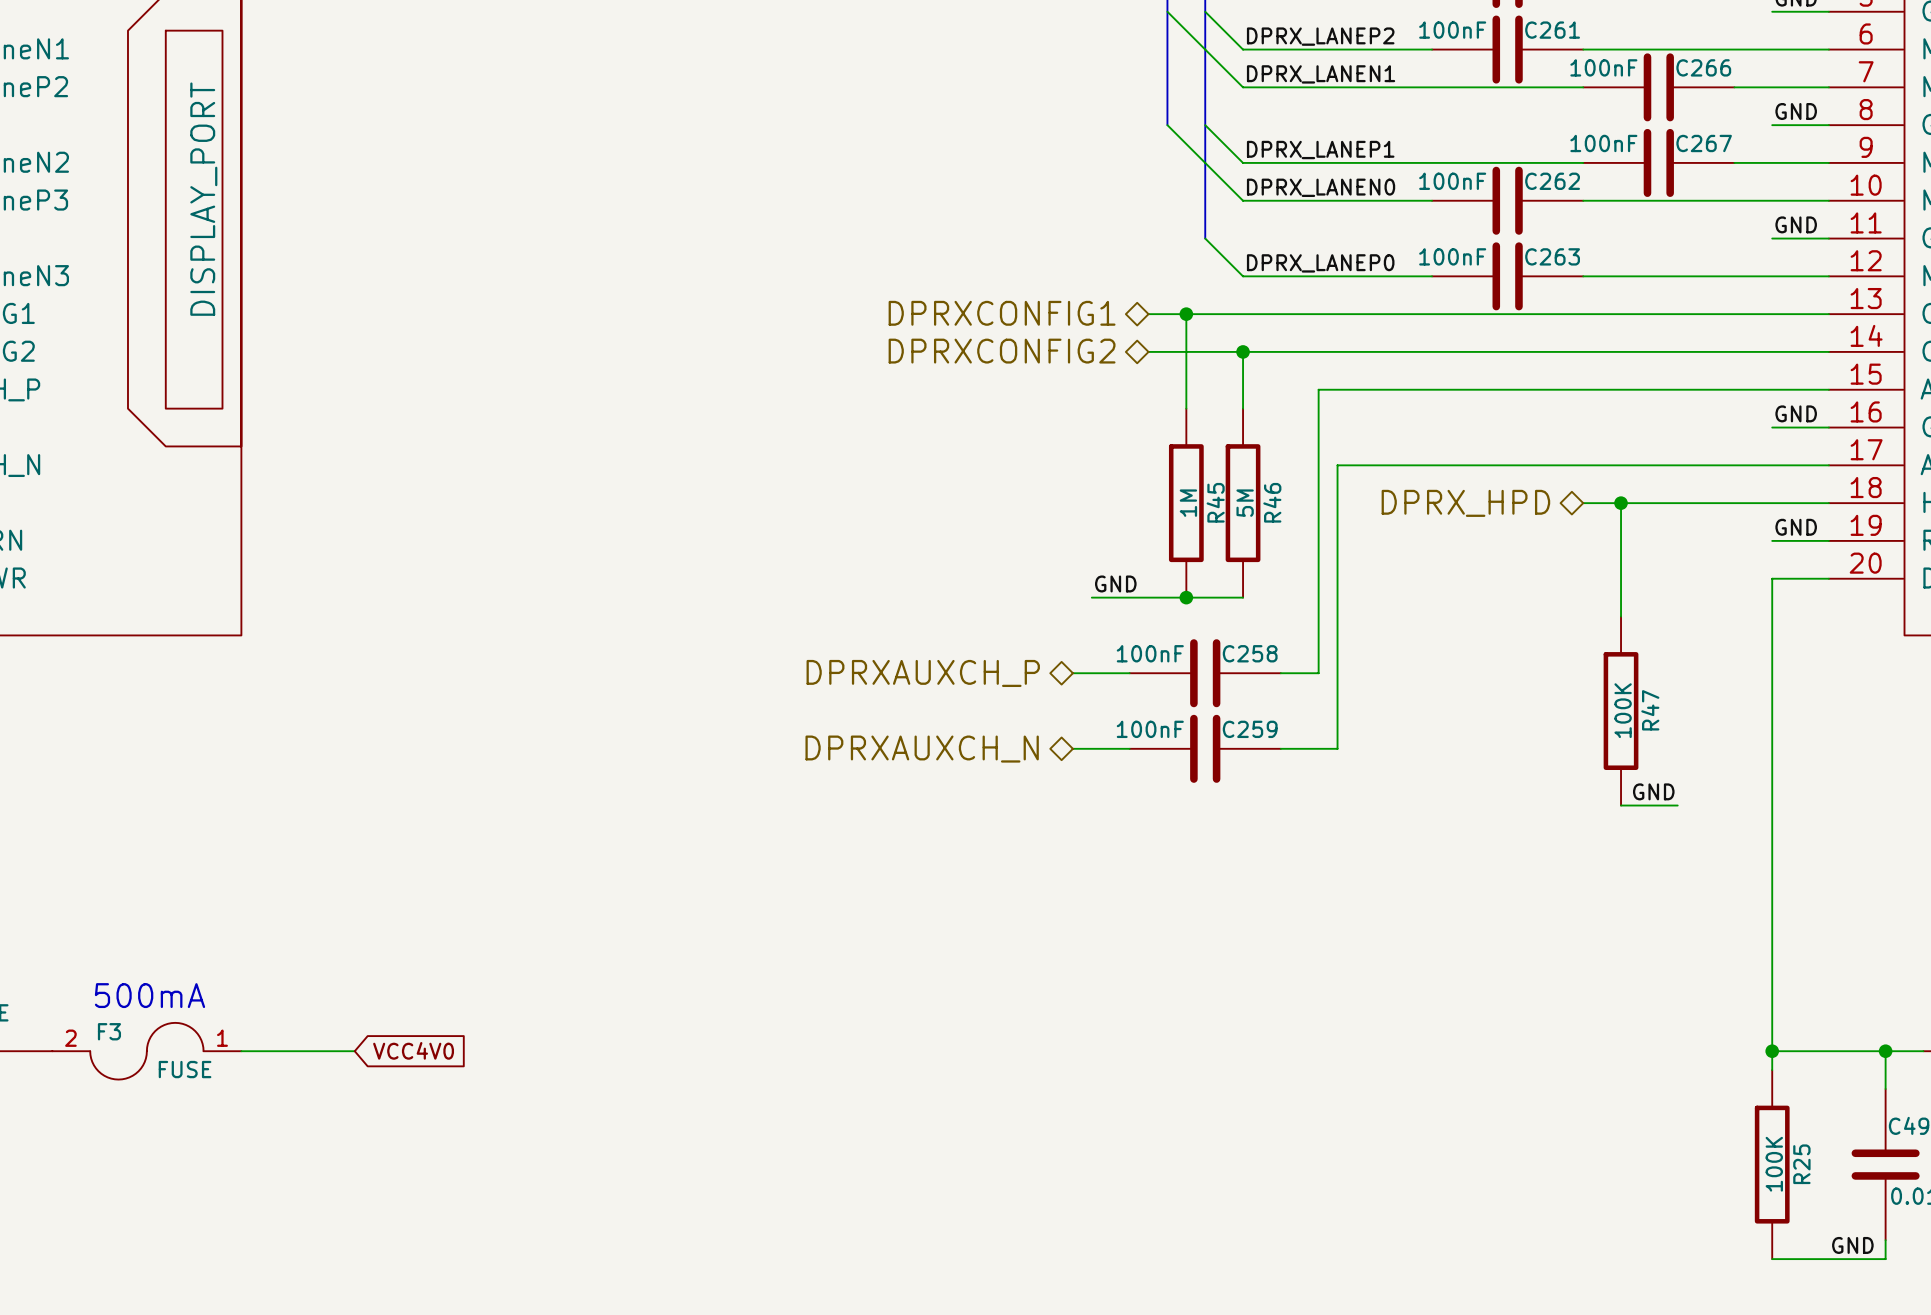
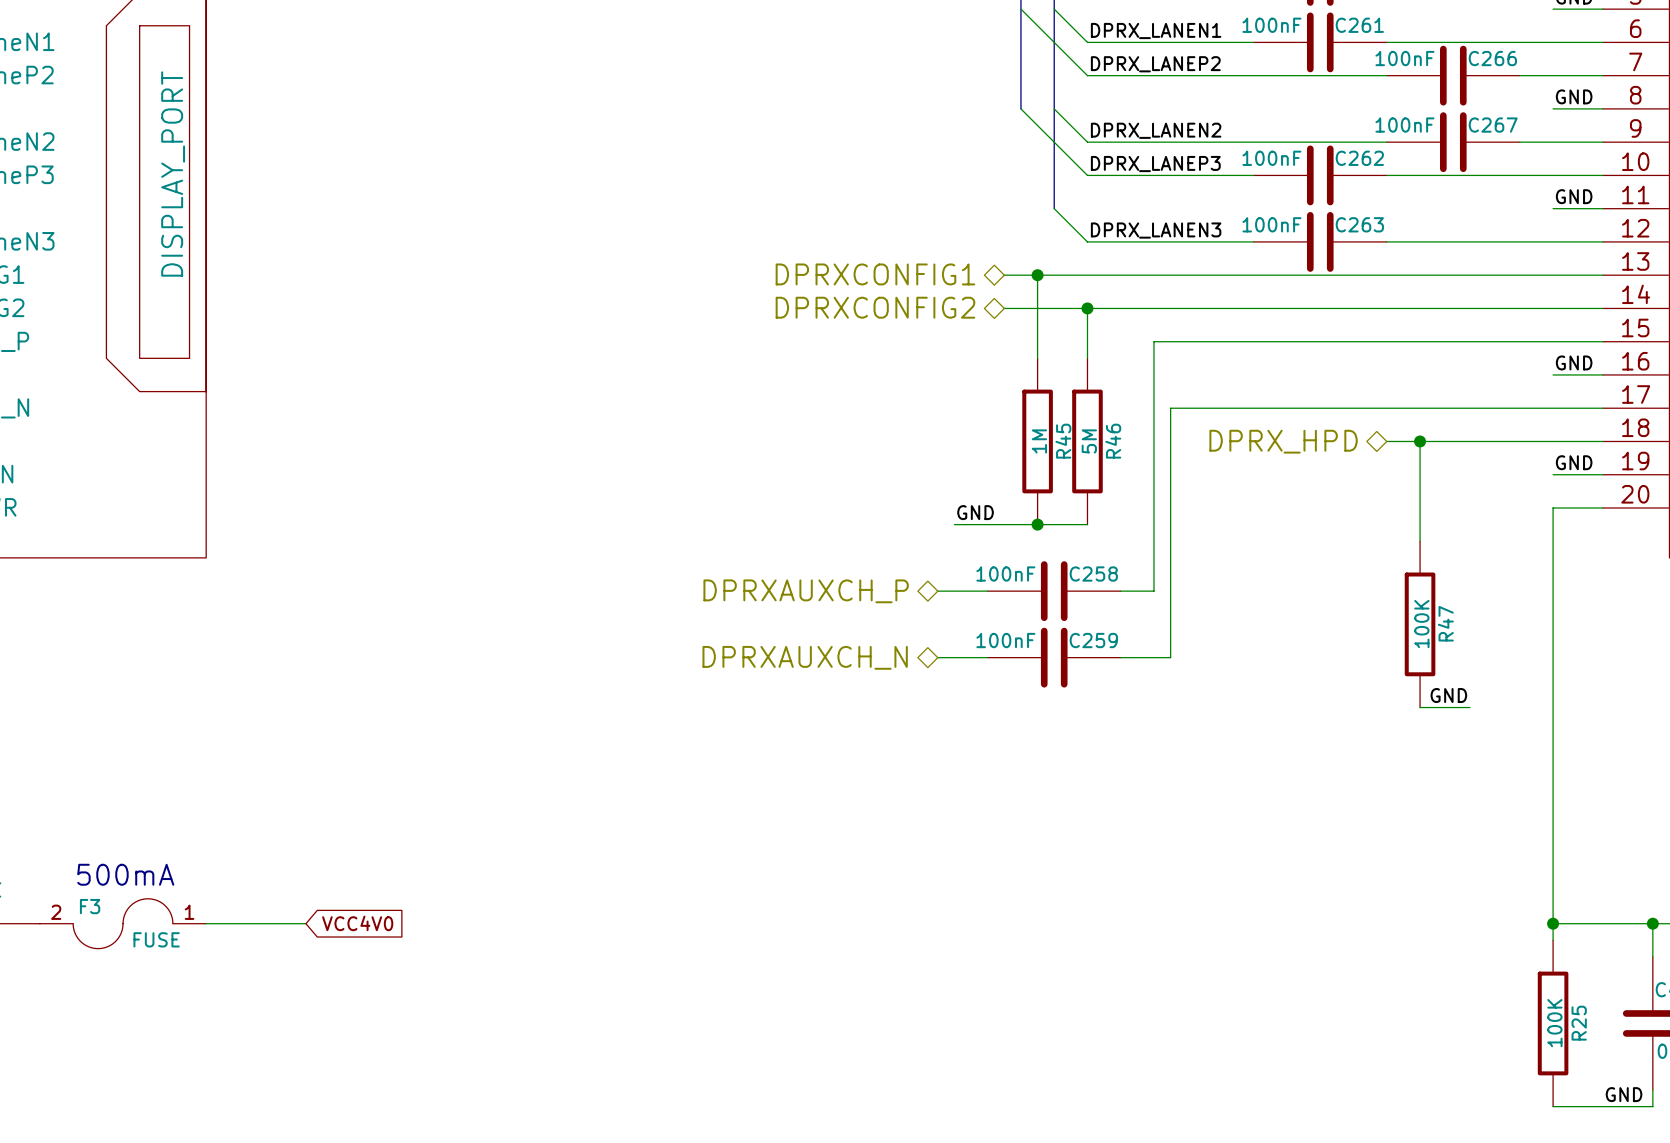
label: DPRX_LANEP2 (1320, 36) -> DPRX_LANEN1 (1156, 31)
label: DPRX_LANEN1 (1321, 74) -> DPRX_LANEP2 (1155, 64)
label: DPRX_LANEP1 (1320, 150) -> DPRX_LANEN2 (1156, 130)
label: DPRX_LANEN0 (1321, 187) -> DPRX_LANEP3 (1155, 164)
label: DPRX_LANEP0 (1320, 263) -> DPRX_LANEN3 (1156, 230)

